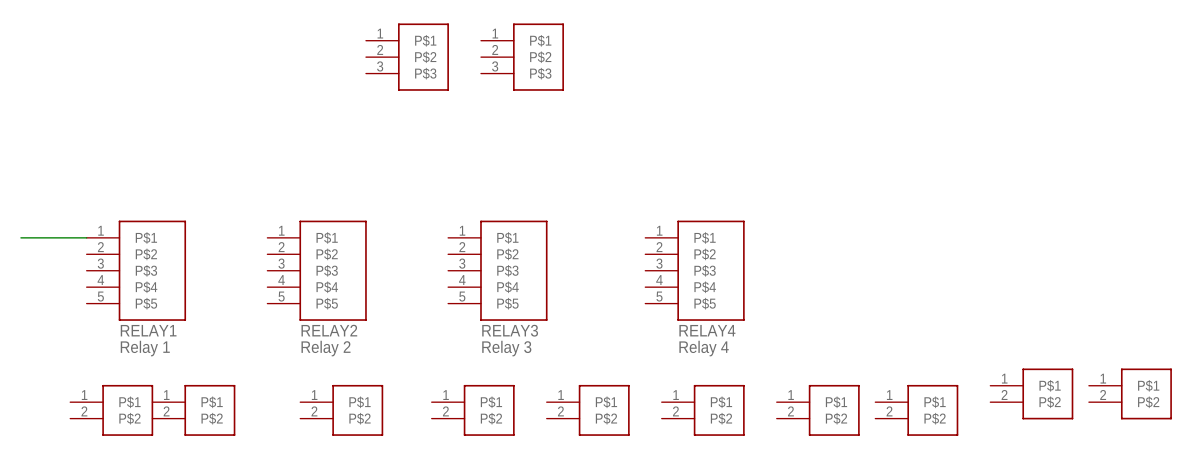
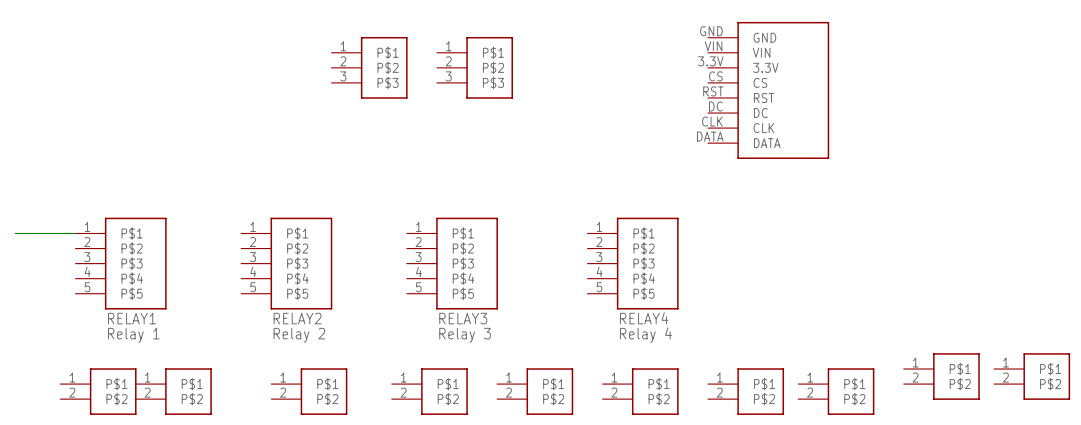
part: none -> (768, 90)

